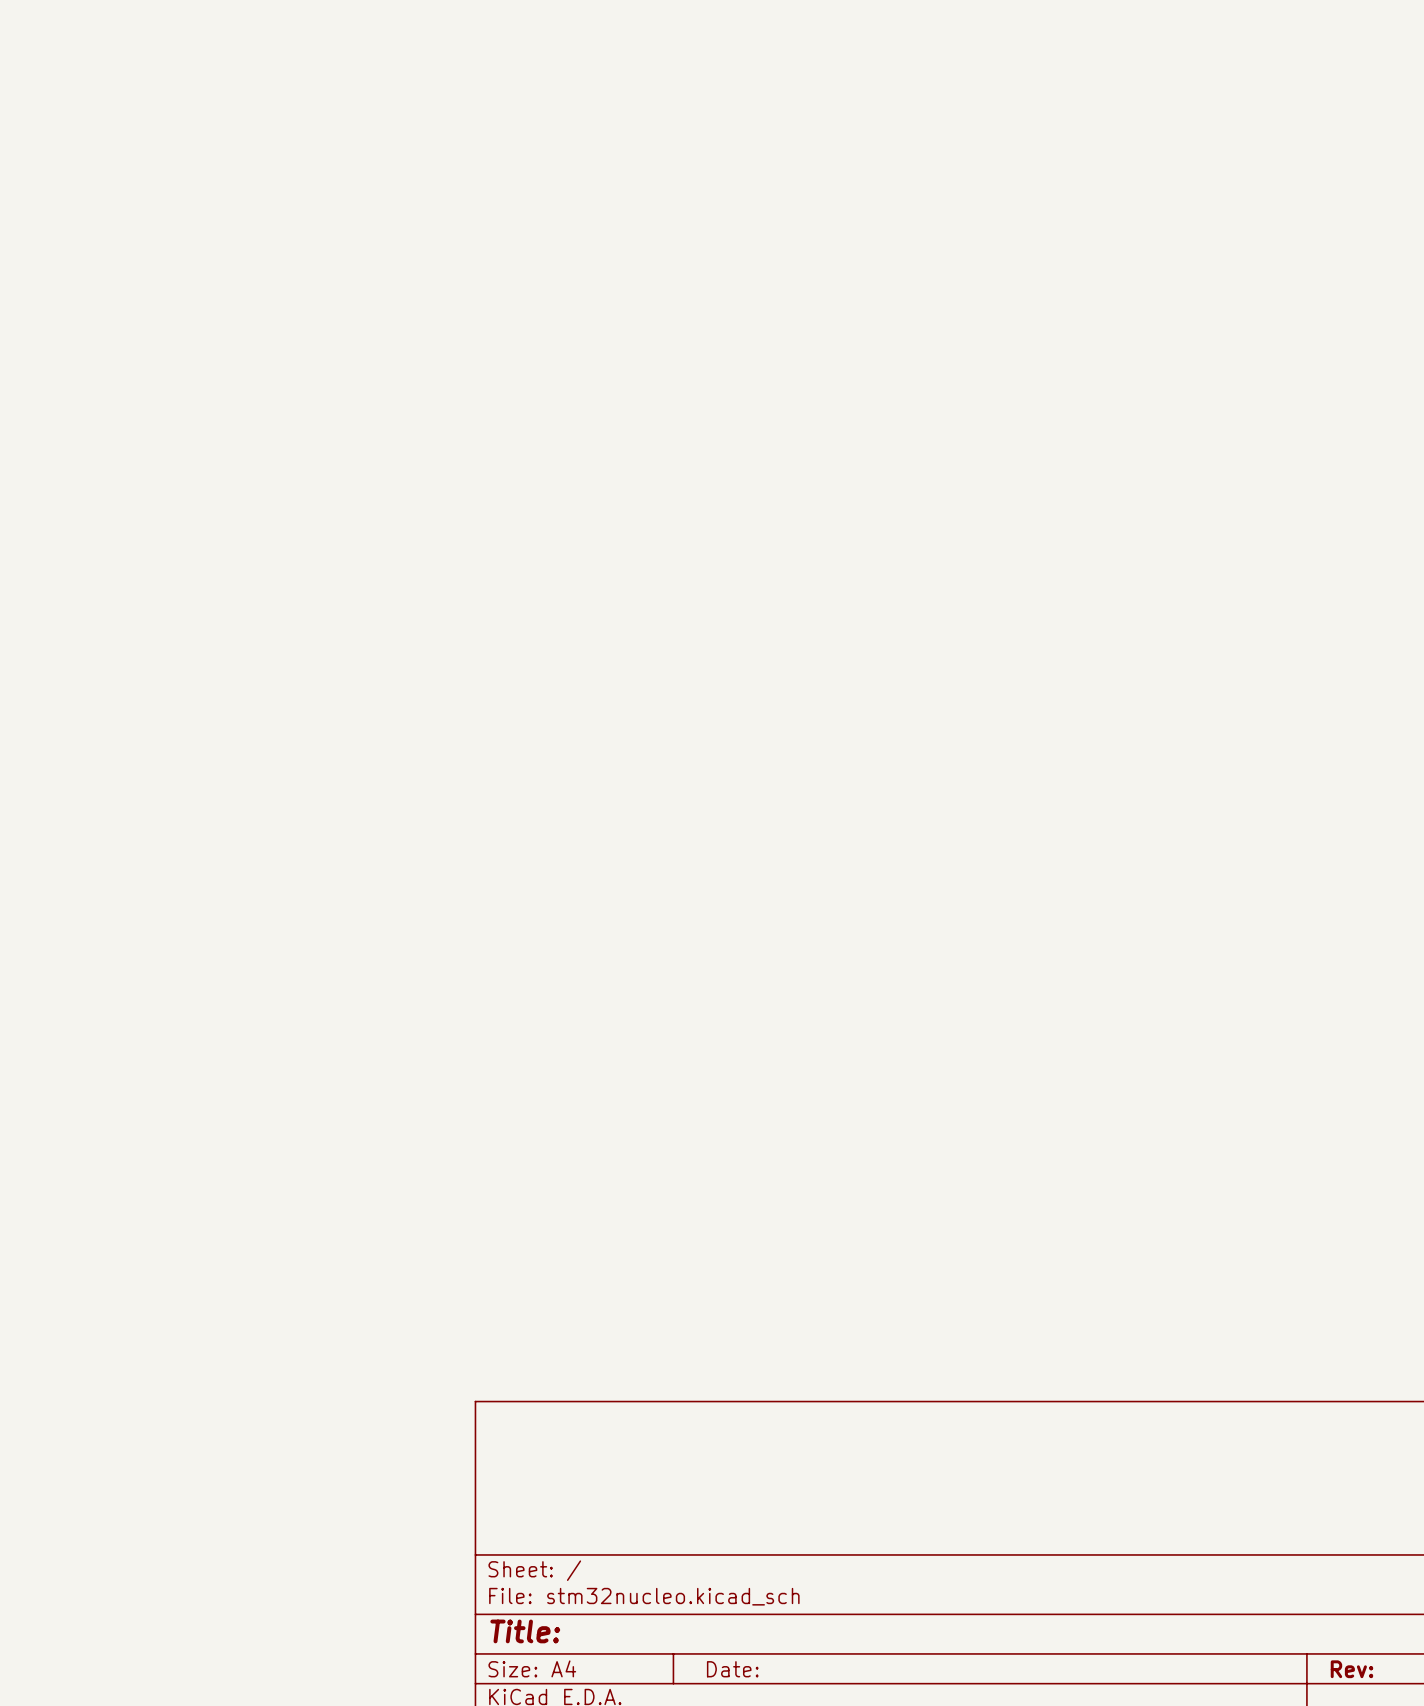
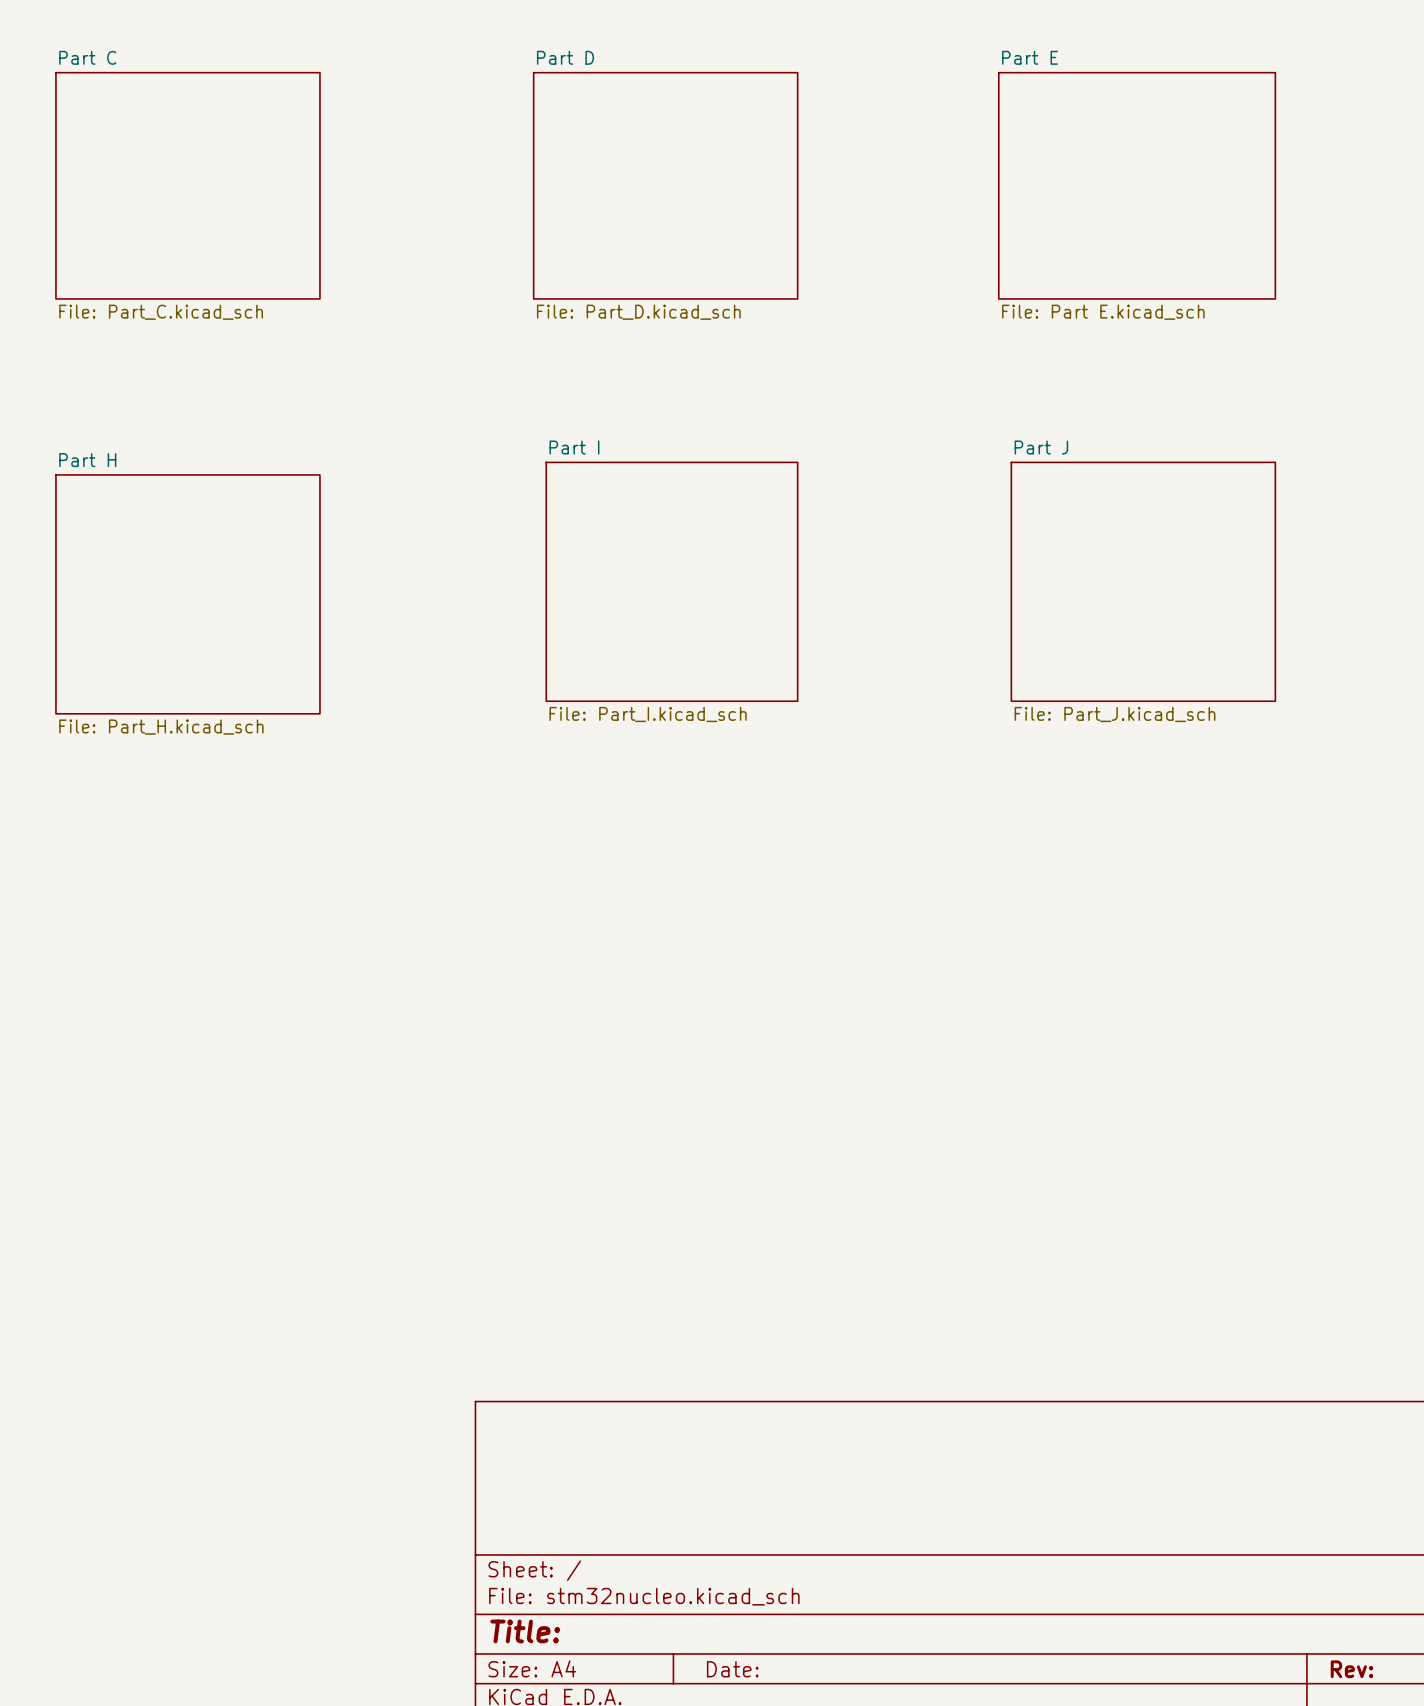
sheet Part C: none -> File: Part_C.kicad_sch (187, 185)
sheet Part D: none -> File: Part_D.kicad_sch (665, 185)
sheet Part E: none -> File: Part E.kicad_sch (1137, 185)
sheet Part I: none -> File: Part_I.kicad_sch (671, 581)
sheet Part J: none -> File: Part_J.kicad_sch (1143, 581)
sheet Part H: none -> File: Part_H.kicad_sch (187, 594)

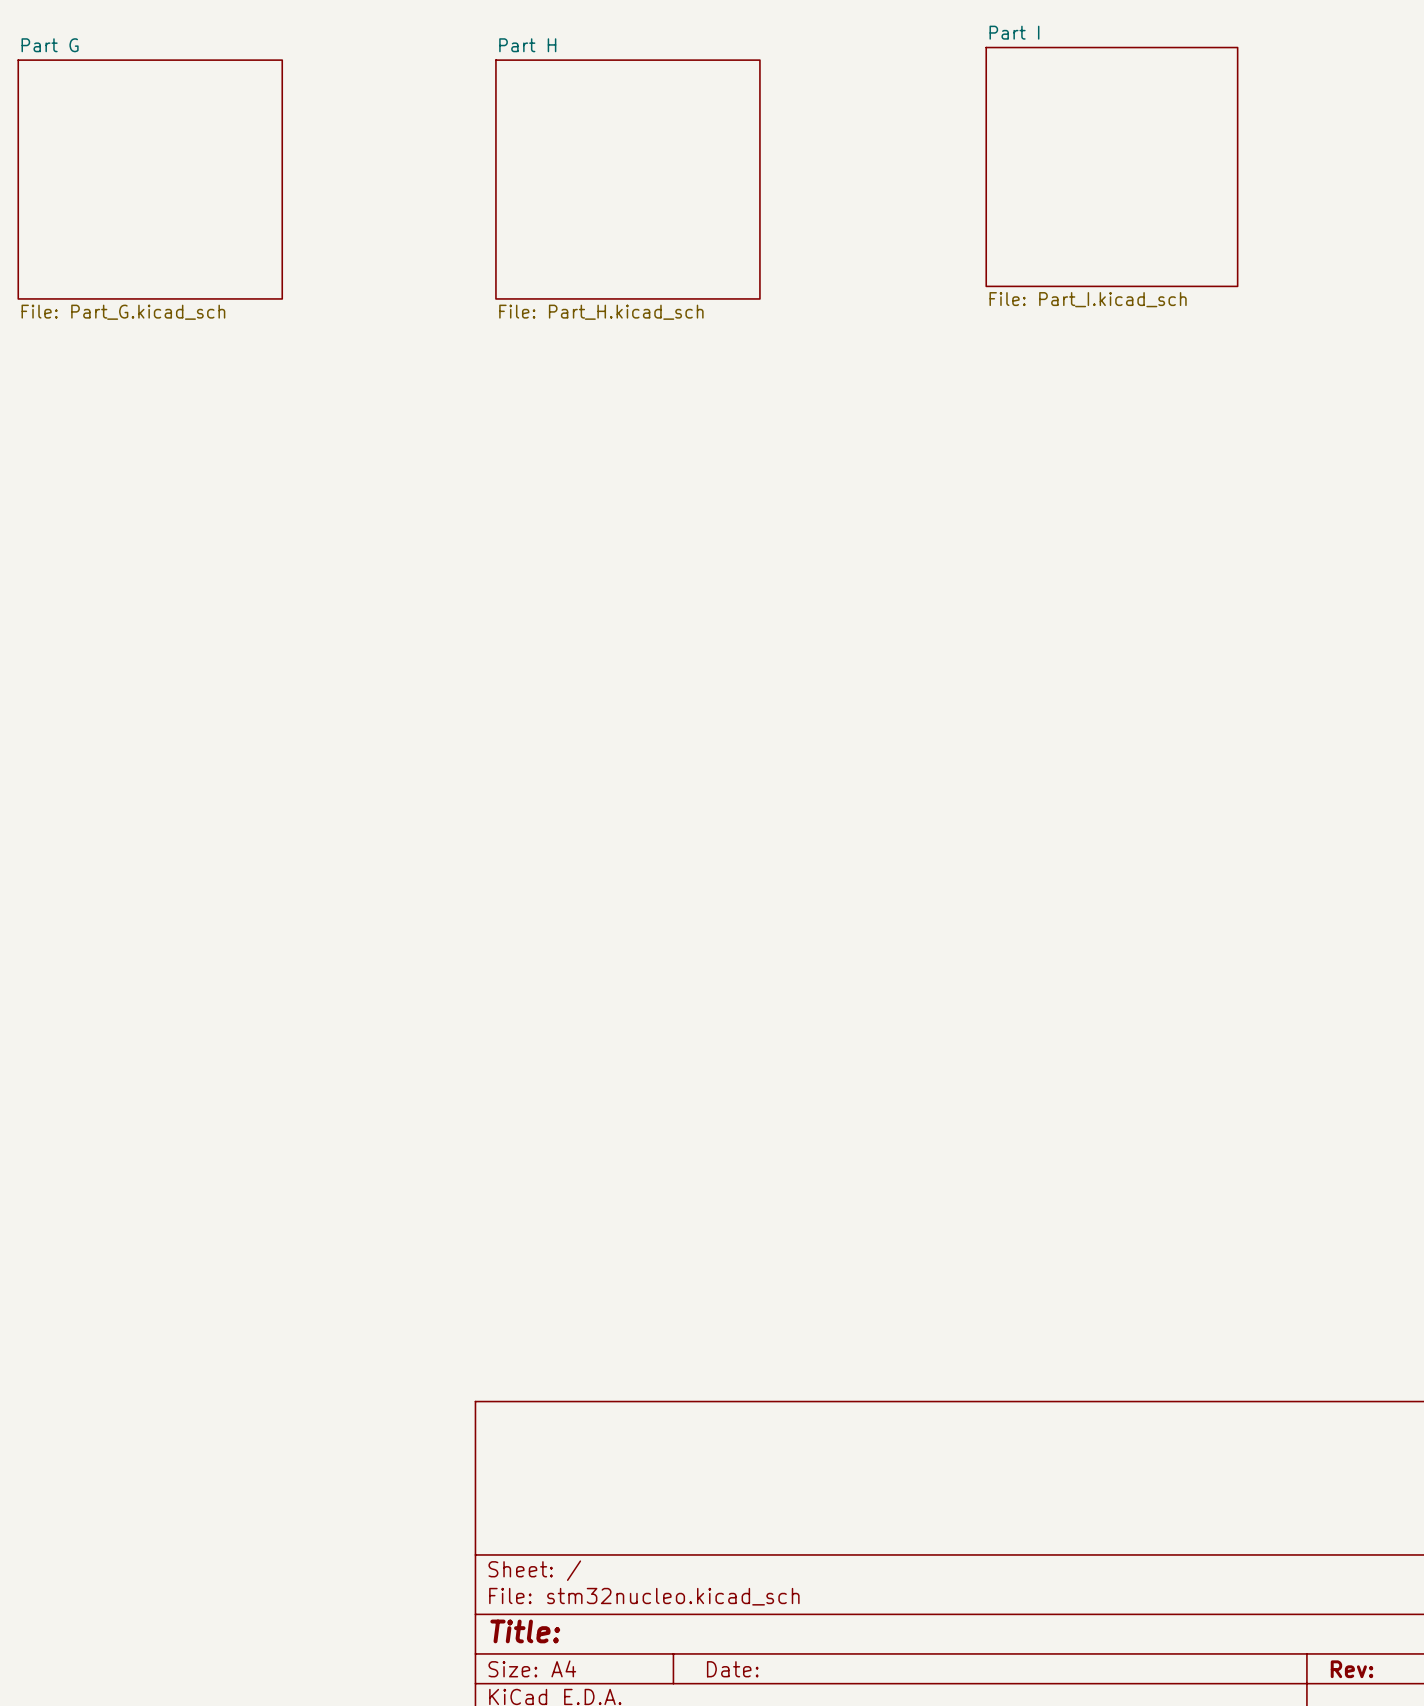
sheet Part I: none -> File: Part_I.kicad_sch (1111, 166)
sheet Part G: none -> File: Part_G.kicad_sch (150, 179)
sheet Part H: none -> File: Part_H.kicad_sch (627, 179)
sheet Part C: File: Part_C.kicad_sch (187, 185) -> none
sheet Part D: File: Part_D.kicad_sch (665, 185) -> none
sheet Part E: File: Part E.kicad_sch (1137, 185) -> none
sheet Part I: File: Part_I.kicad_sch (671, 581) -> none
sheet Part J: File: Part_J.kicad_sch (1143, 581) -> none
sheet Part H: File: Part_H.kicad_sch (187, 594) -> none

